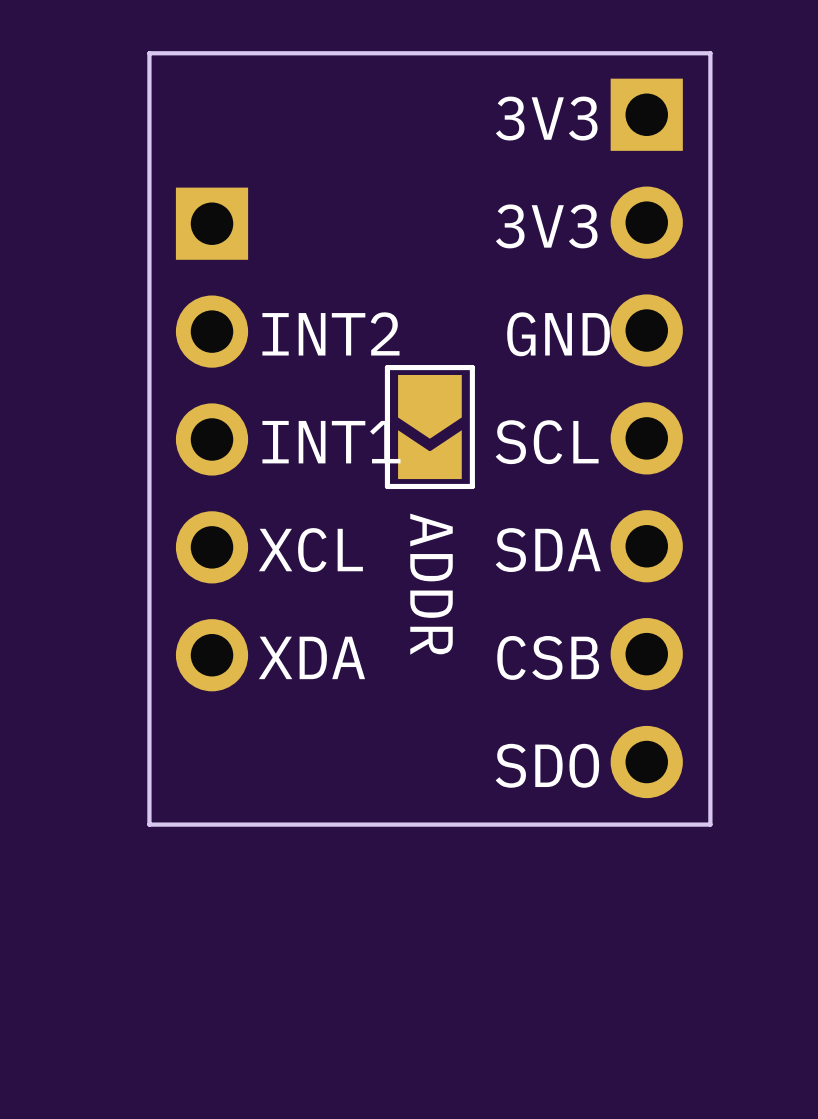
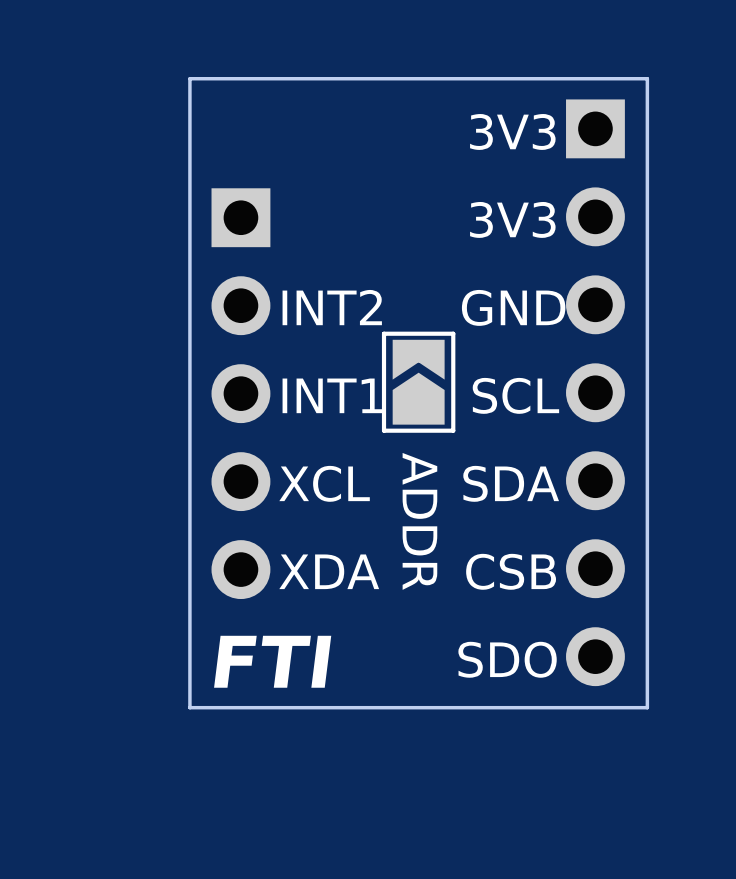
part rotation: 0° (429, 427) -> 180° (418, 382)
text: none -> FTI (272, 661)

